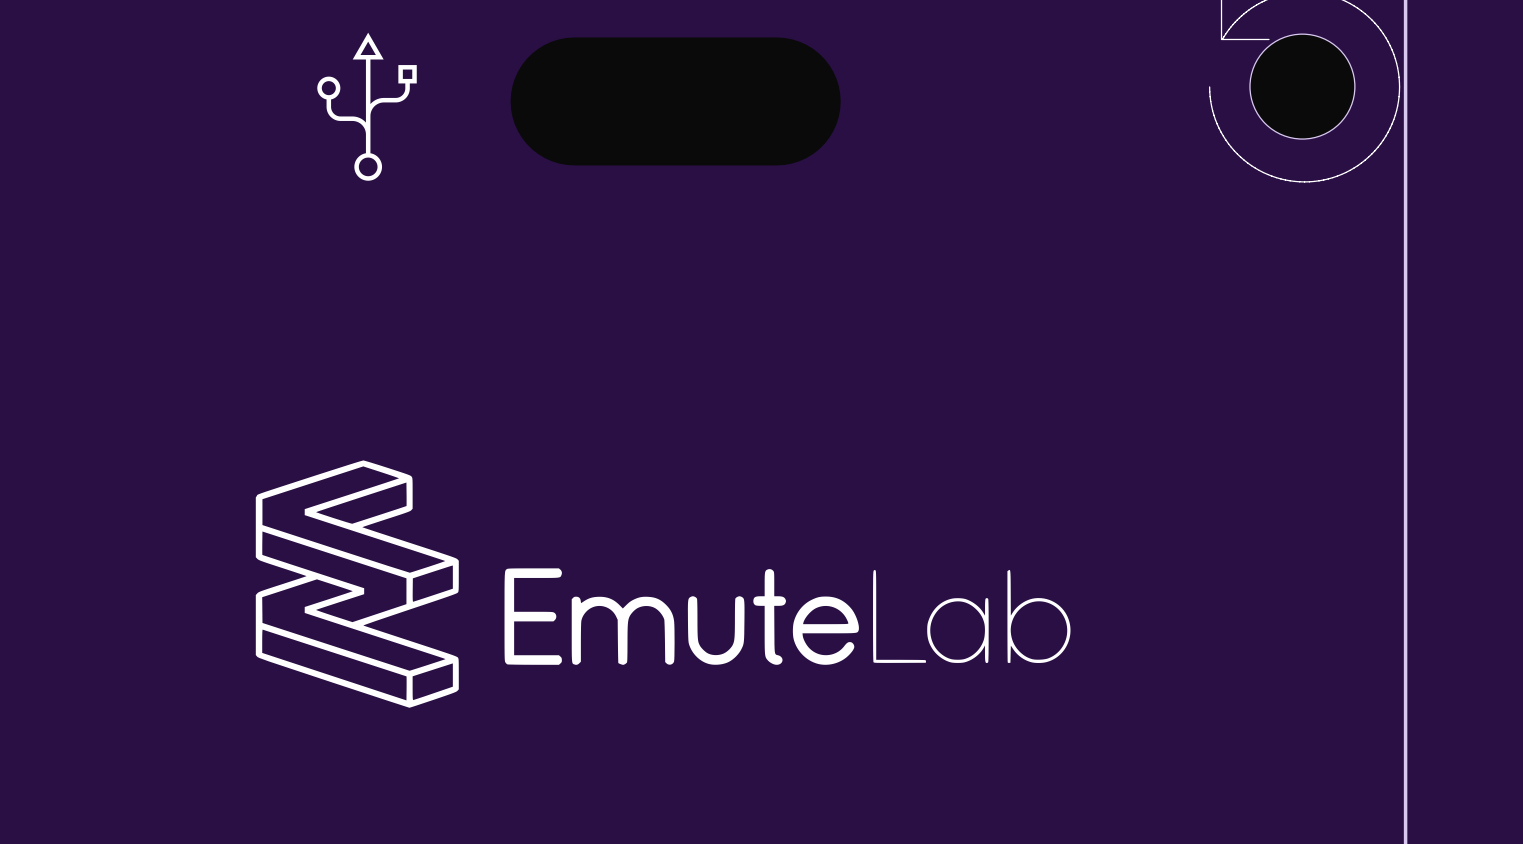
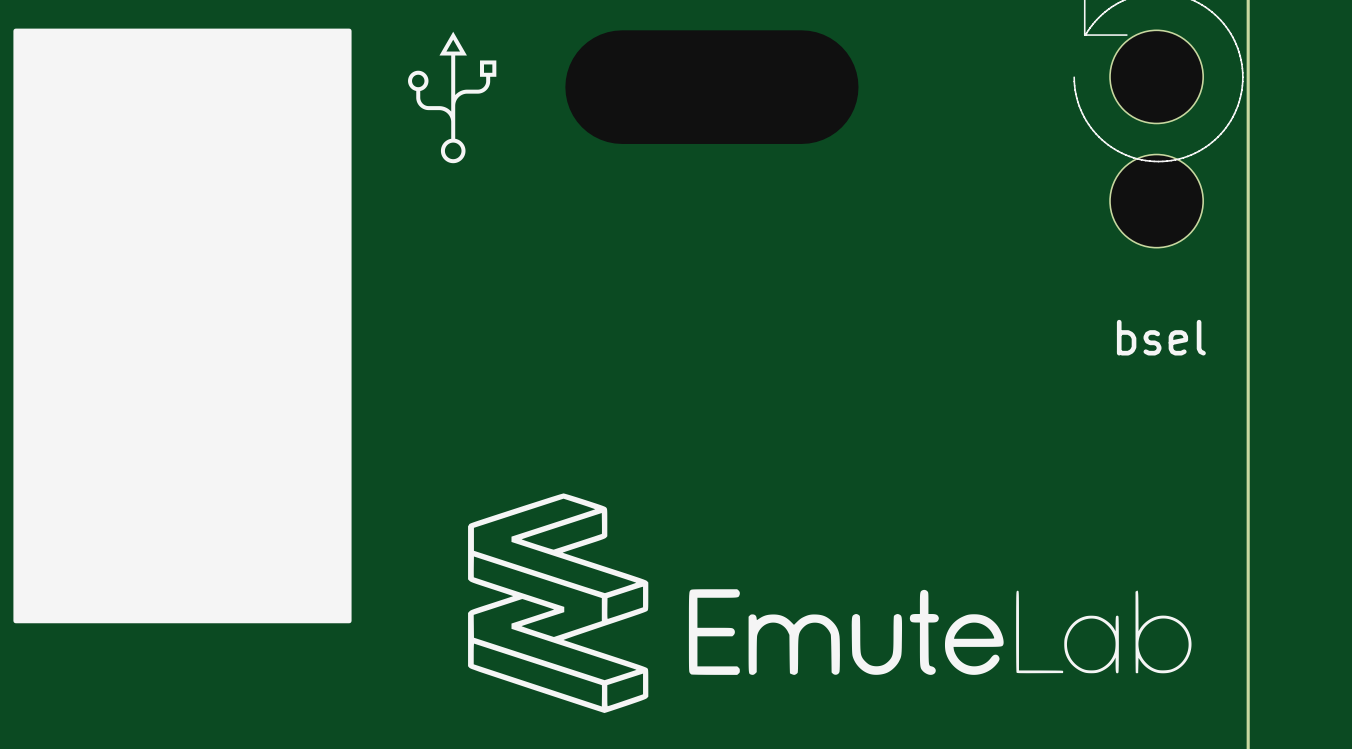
drawing: none -> [13, 28, 352, 624]
part position: (675, 101) -> (711, 87)
drawing position: (367, 106) -> (452, 97)
part: none -> (1156, 201)
text: none -> bsel (1161, 337)
drawing: [873, 570, 926, 663] -> none
drawing position: (357, 584) -> (558, 603)
drawing position: (533, 616) -> (714, 632)
drawing position: (769, 616) -> (924, 632)
drawing position: (1038, 616) -> (1163, 631)
drawing position: (623, 630) -> (794, 644)
drawing position: (716, 630) -> (876, 644)
drawing position: (825, 630) -> (974, 644)
drawing position: (957, 630) -> (1091, 644)
drawing: none -> [1016, 590, 1064, 674]

